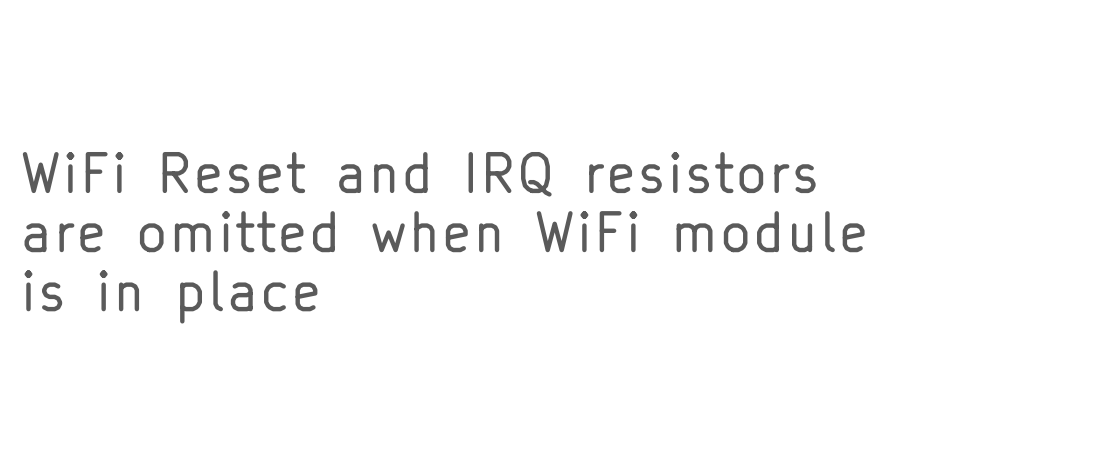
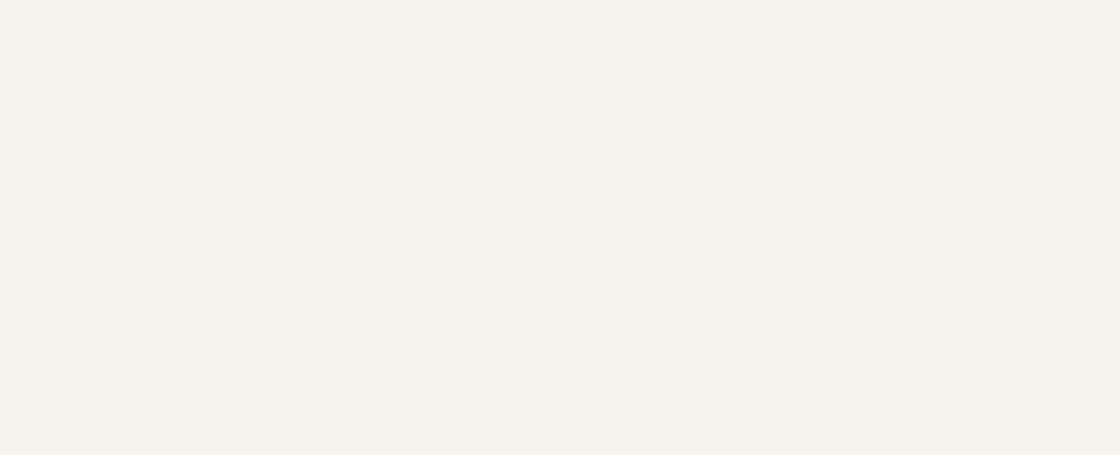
text: WiFi Reset and IRQ resistors (419, 174) -> none
text: are omitted when WiFi module (444, 231) -> none
text: is in place (170, 296) -> none

